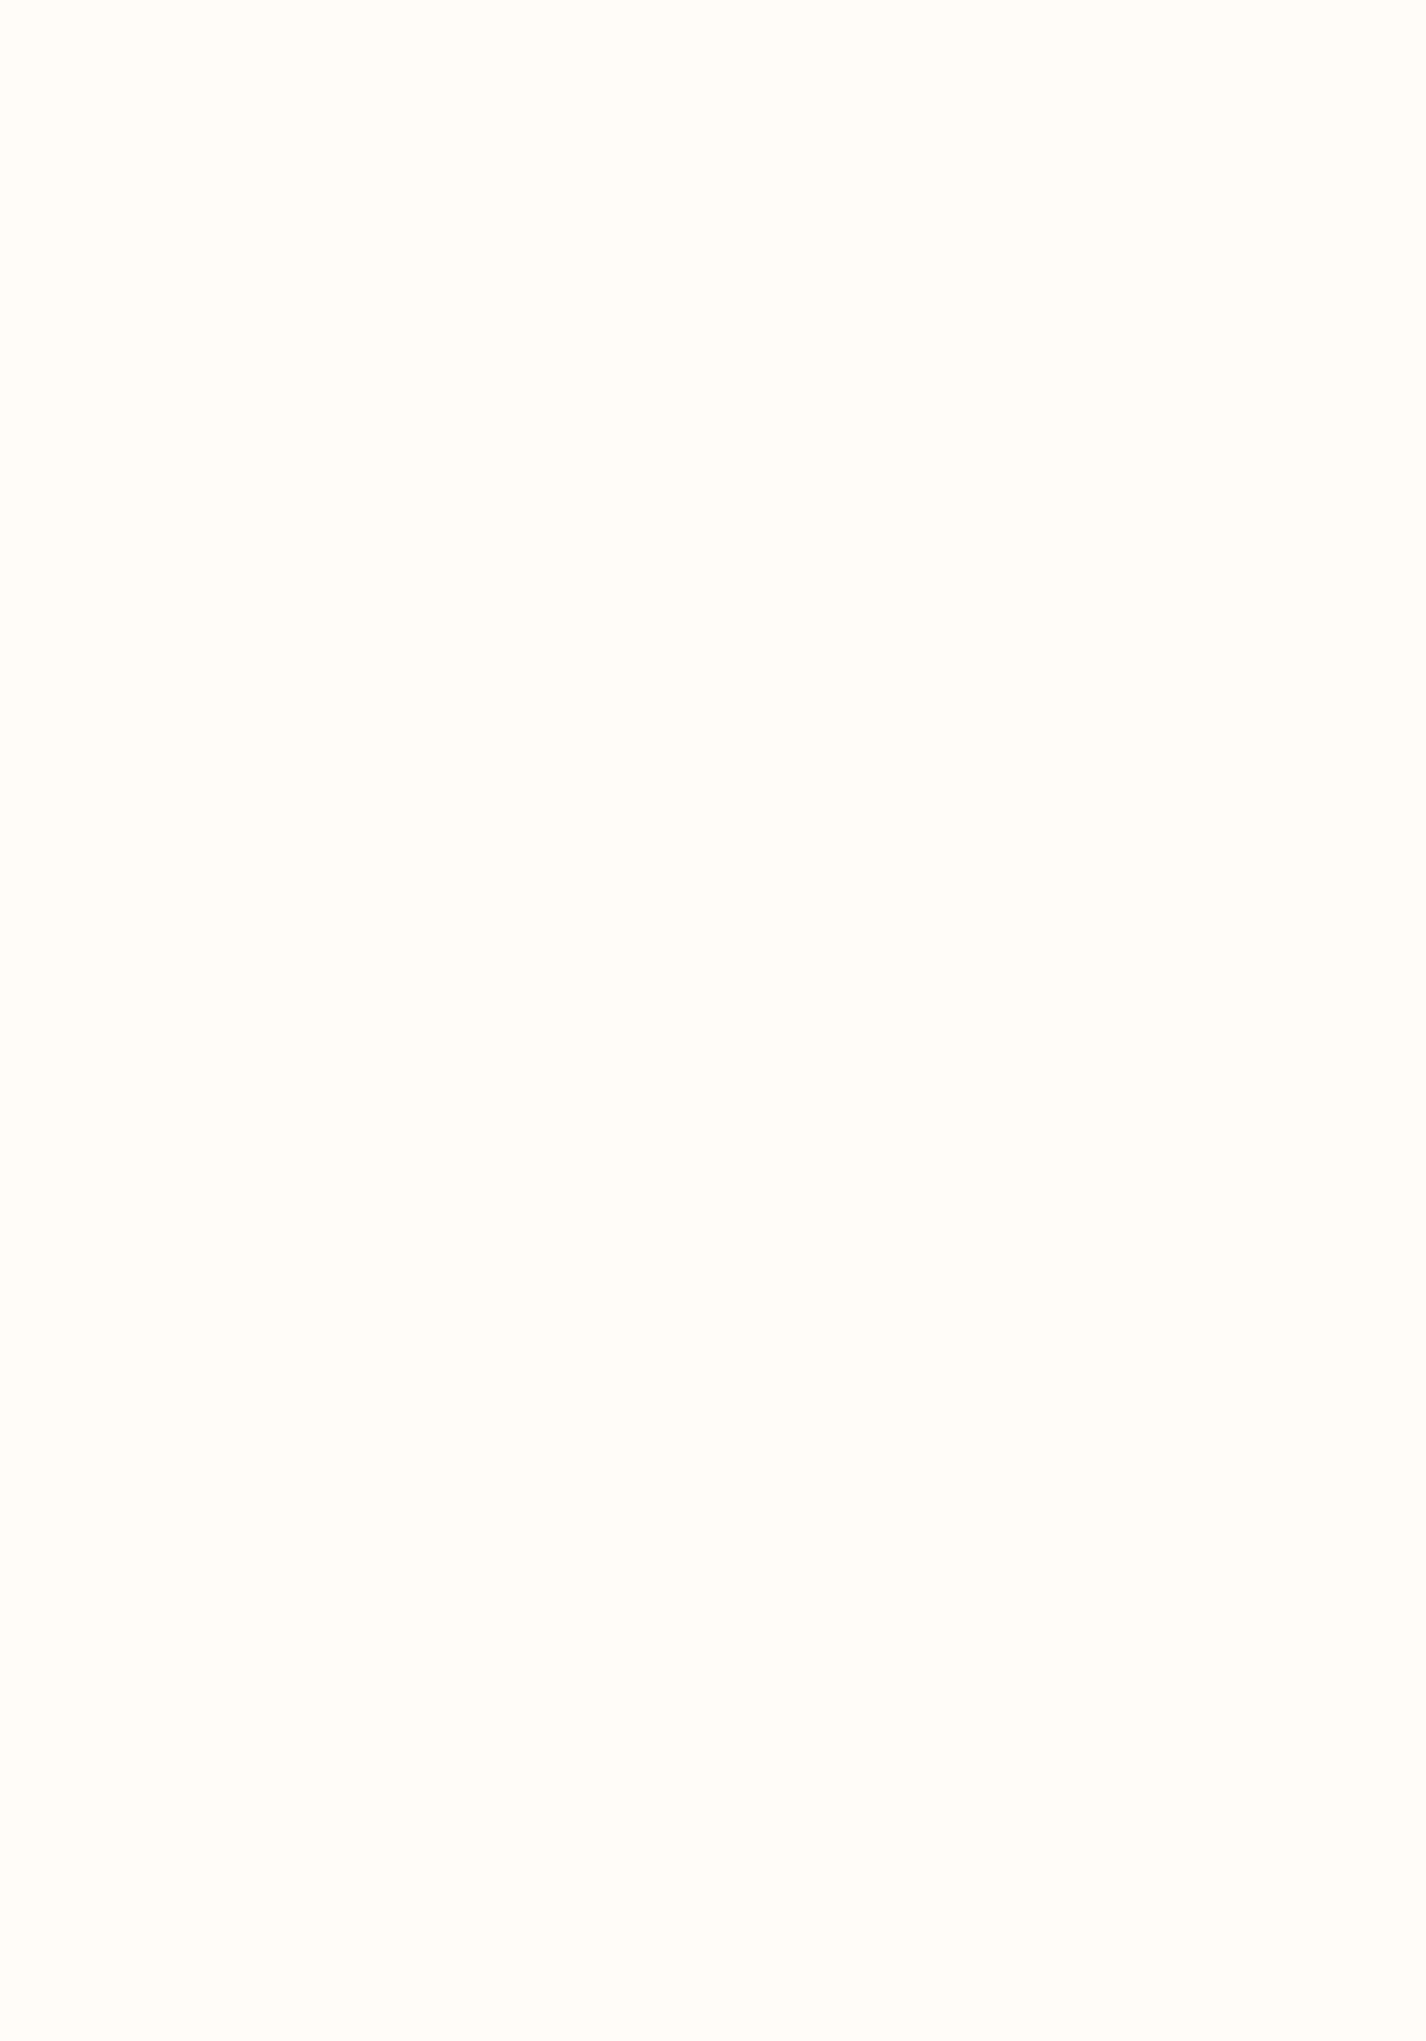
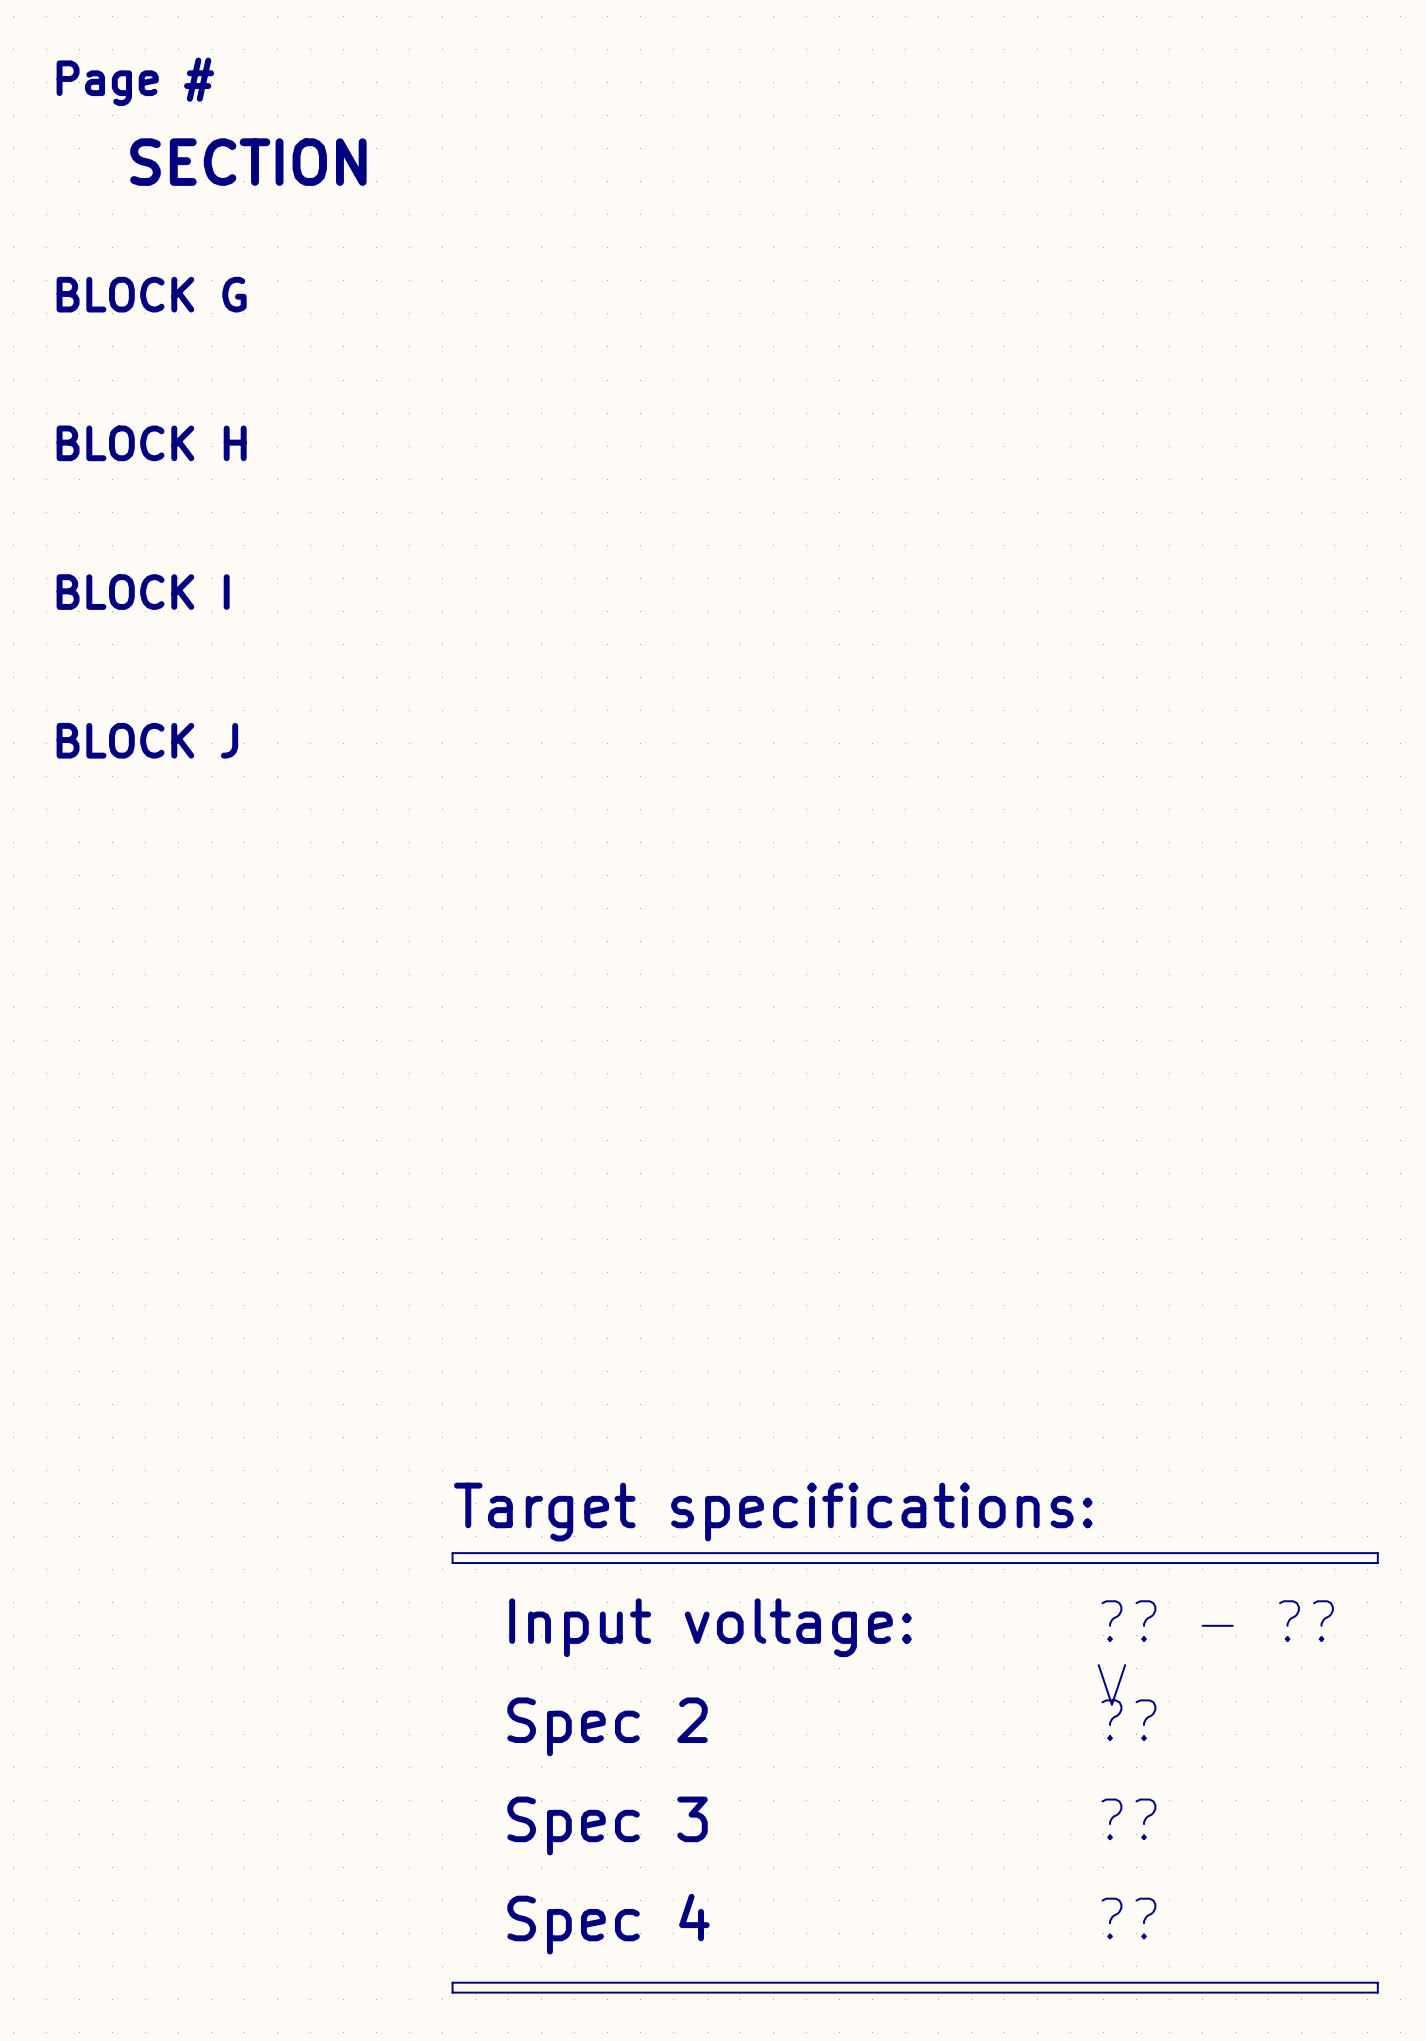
text: none -> Page # (135, 81)
text: none -> SECTION (248, 162)
text: none -> BLOCK G (151, 294)
text: none -> BLOCK H (151, 443)
text: none -> BLOCK I (143, 592)
text: none -> BLOCK J (147, 740)
text: none -> Target specifications: (773, 1512)
line: none -> (452, 1553) (452, 1563) (1377, 1563) (1377, 1553) (452, 1553)
text: none -> ?? - ?? (1217, 1621)
text: none -> Input voltage: (710, 1627)
text: none -> V (1111, 1684)
text: none -> ?? (1128, 1720)
text: none -> Spec 2 (607, 1726)
text: none -> ?? (1128, 1819)
text: none -> Spec 3 (607, 1825)
text: none -> ?? (1128, 1918)
text: none -> Spec 4 (608, 1924)
line: none -> (452, 1982) (1377, 1982) (1377, 1992) (452, 1992) (452, 1982)

